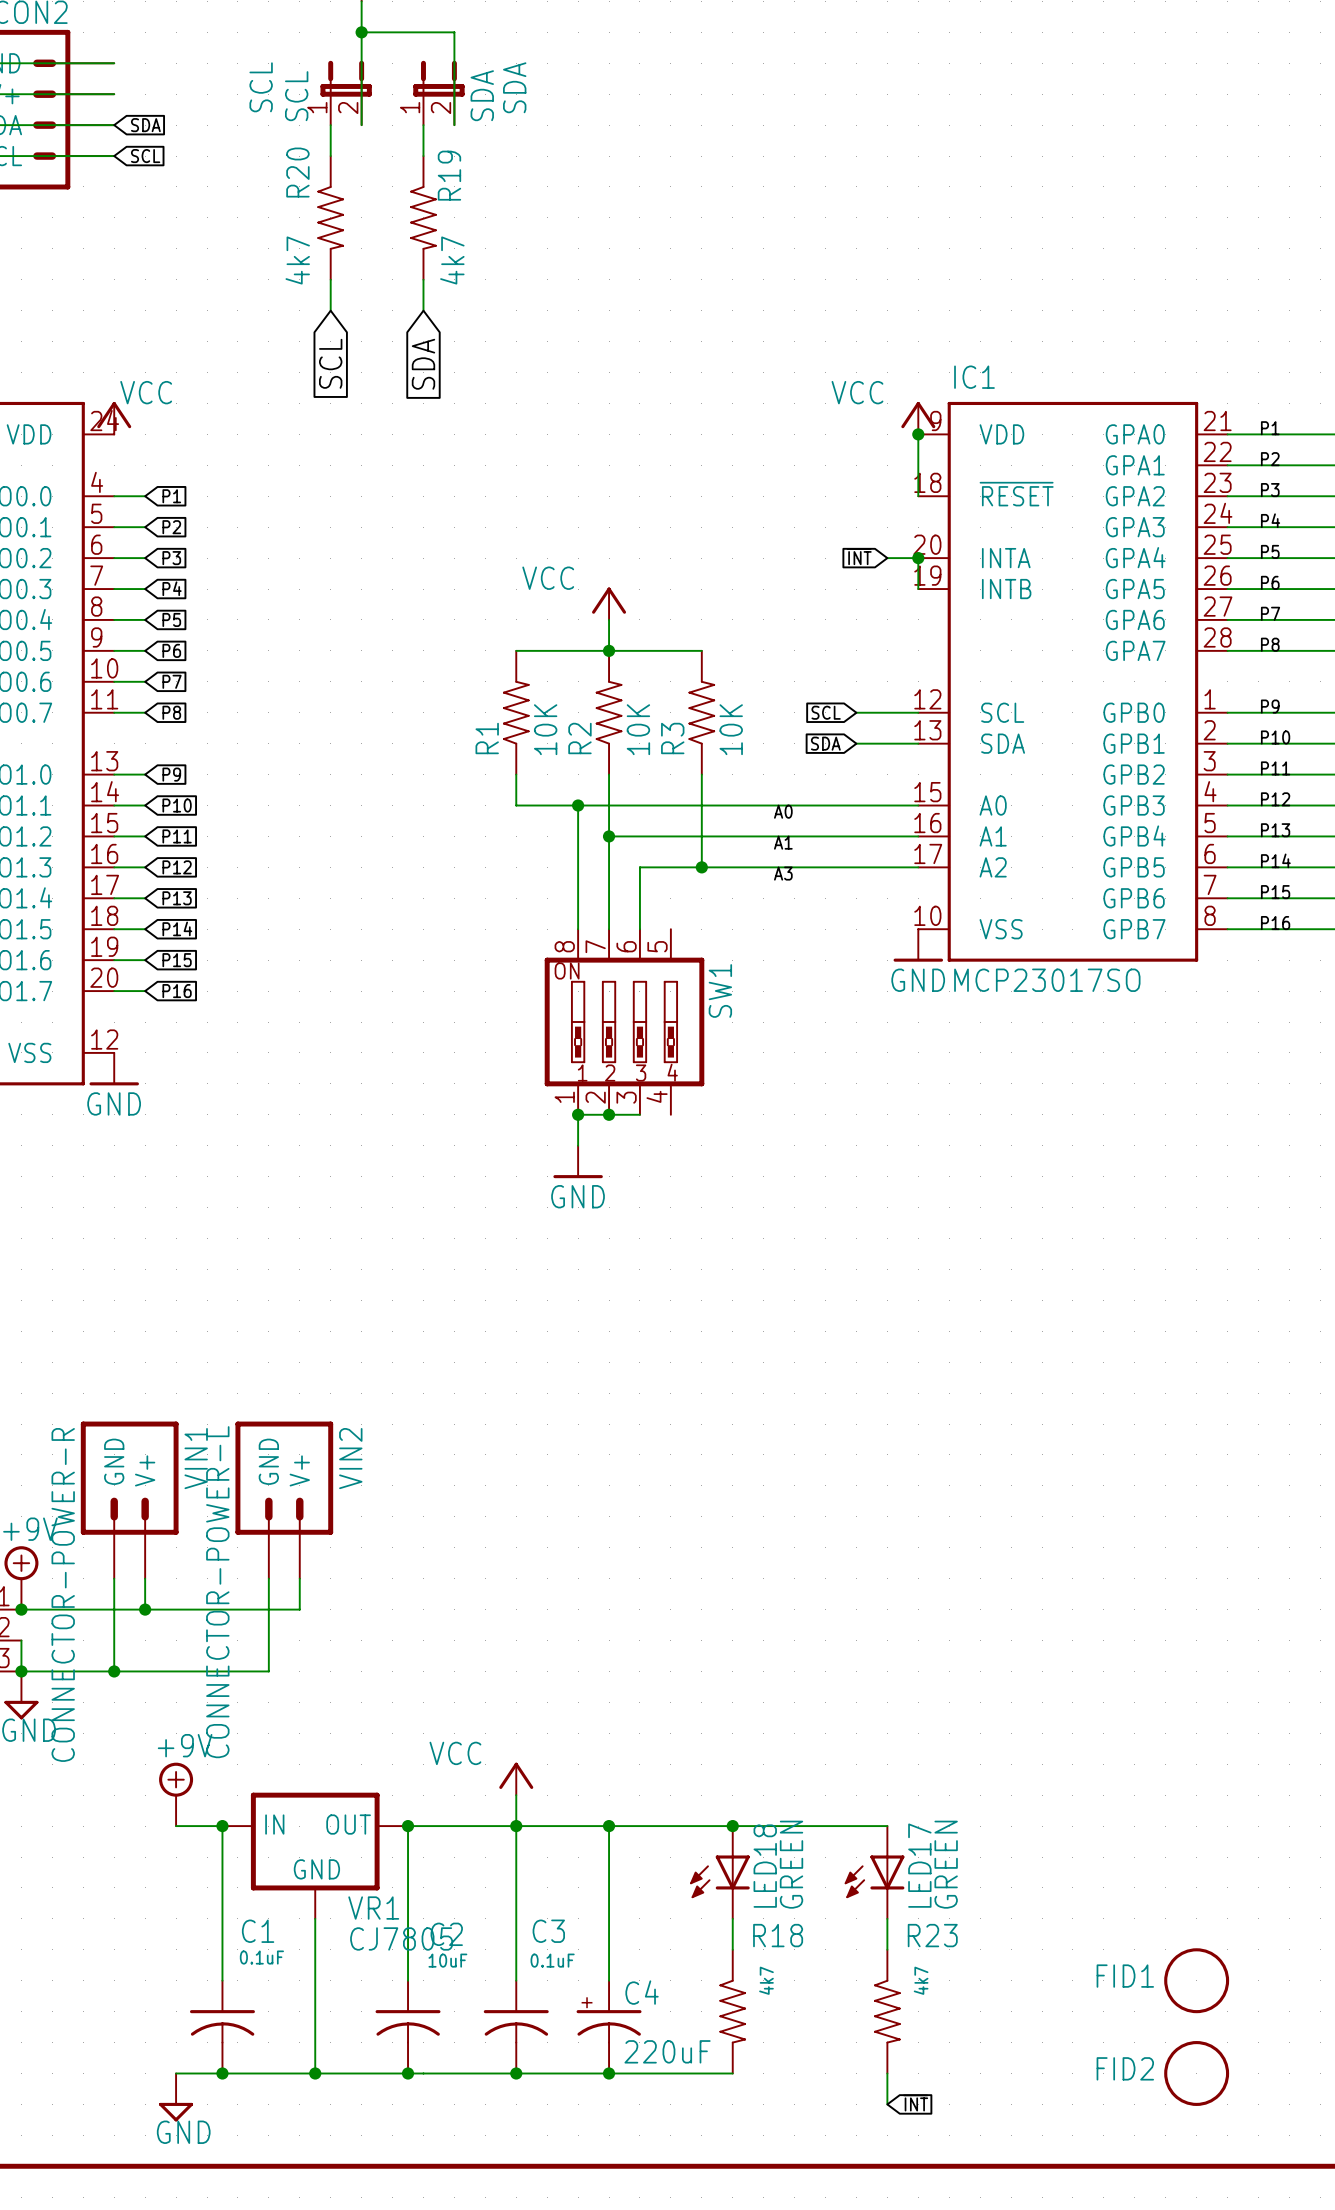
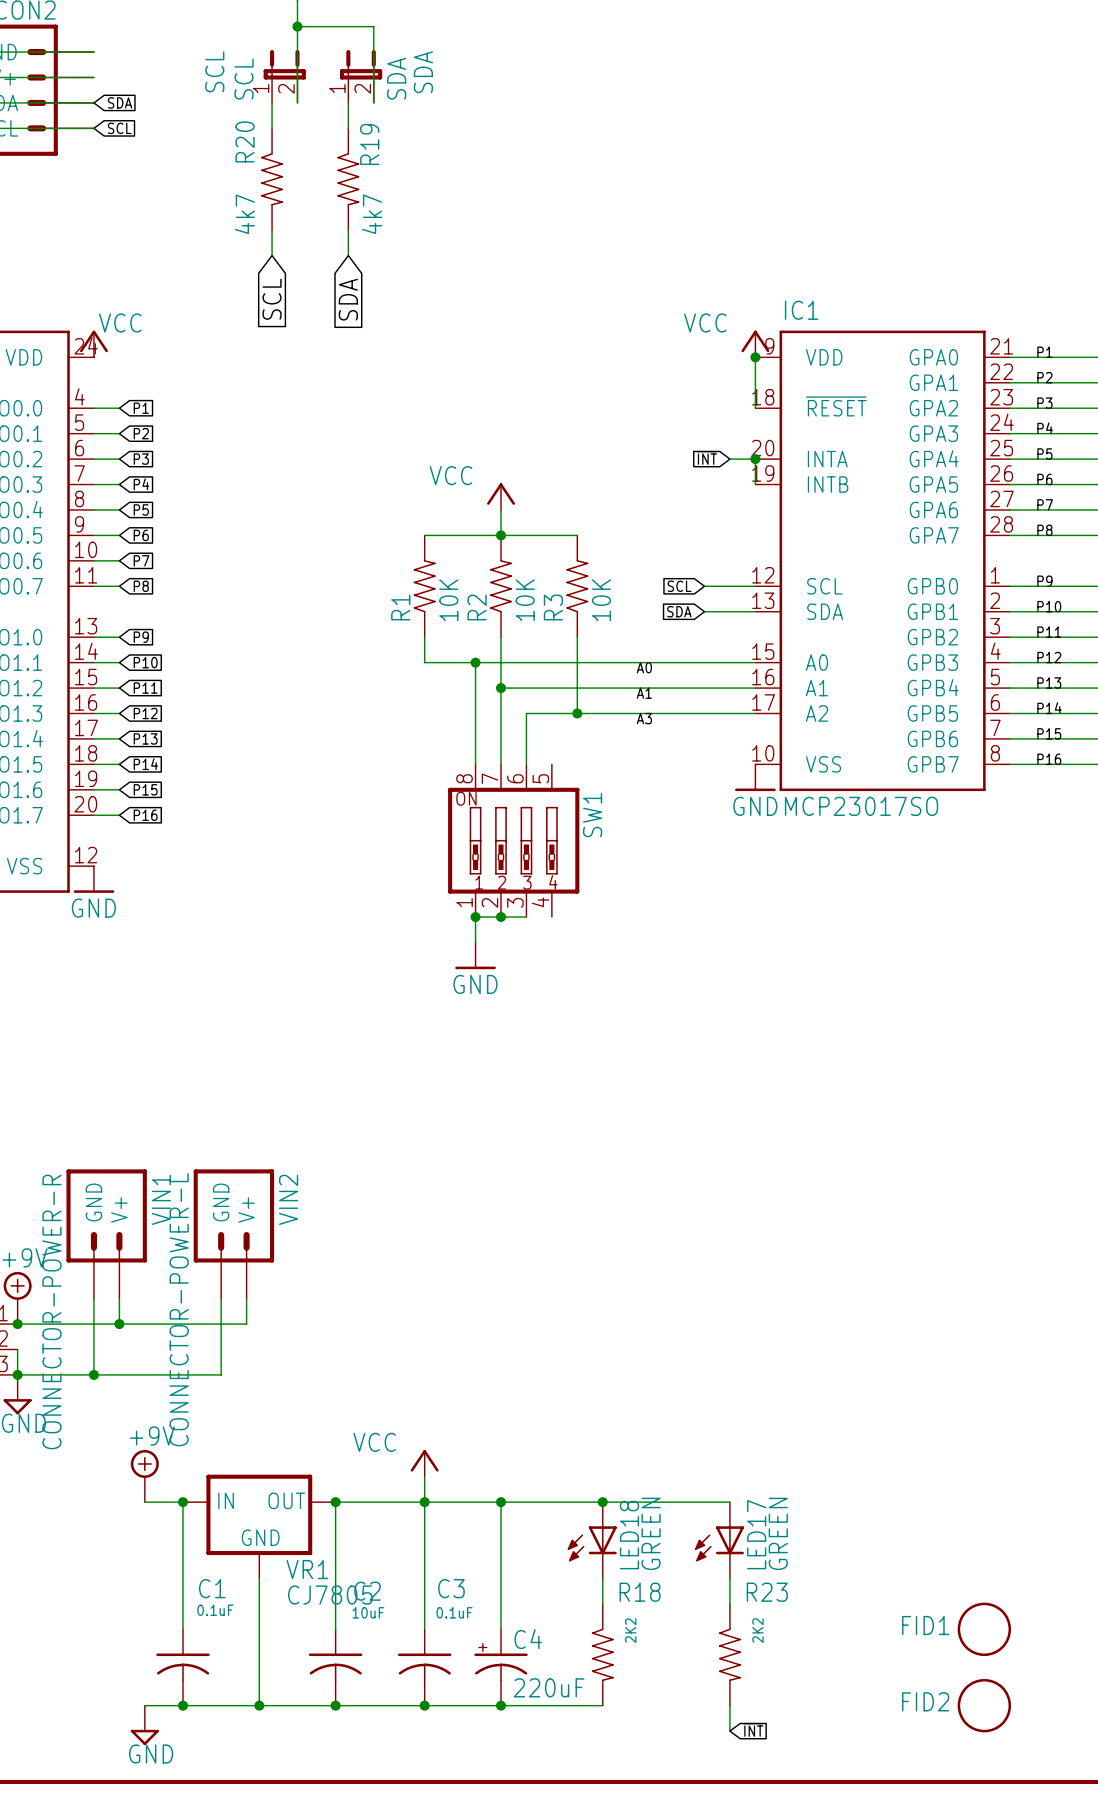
R18 value: 4k7 (766, 1980) -> 2K2 (630, 1630)
R23 value: 4k7 (921, 1980) -> 2K2 (757, 1630)

